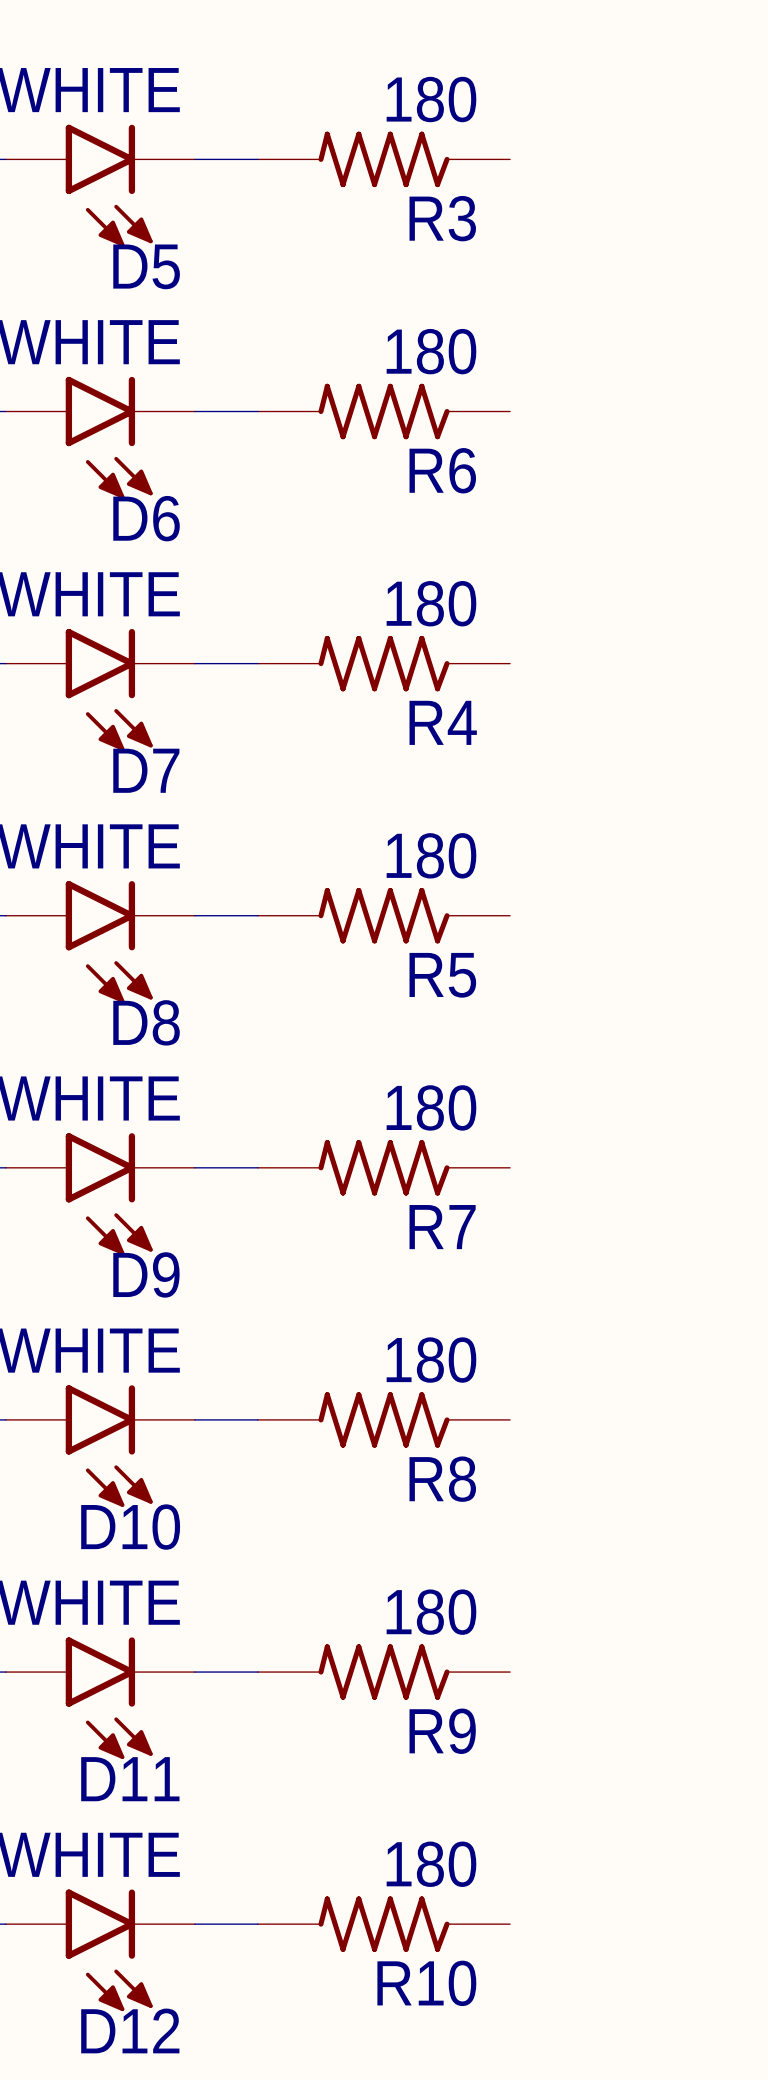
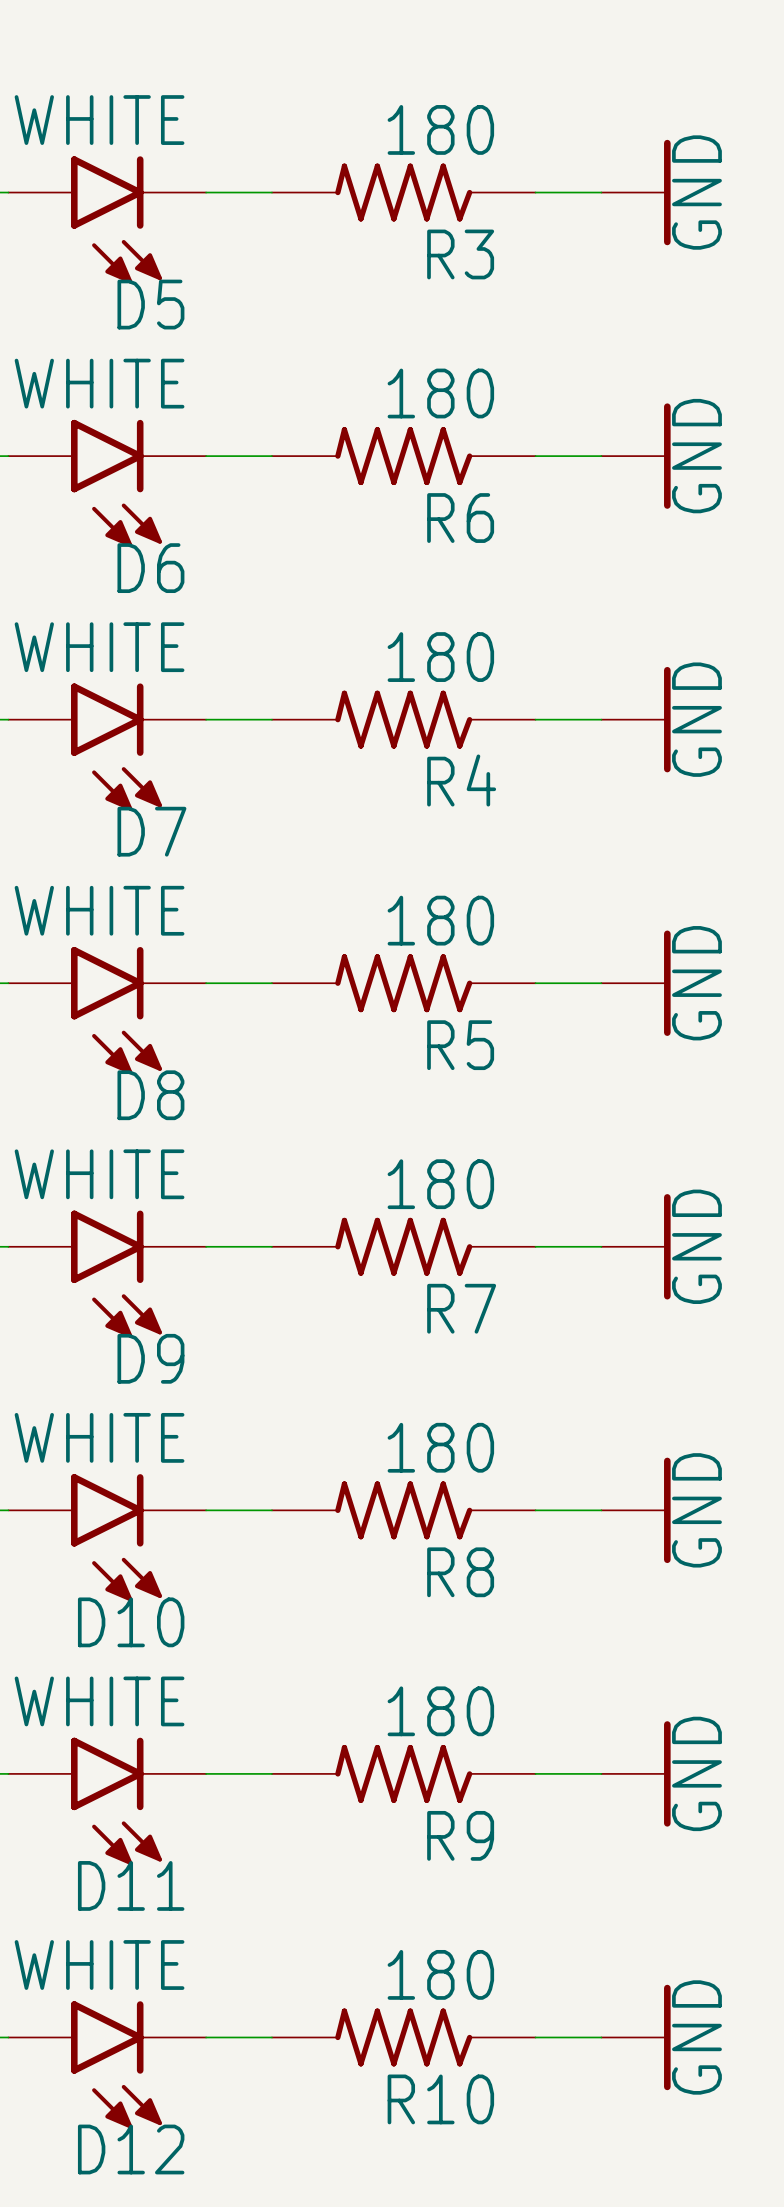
wire: none -> (535, 192) (601, 192)
power symbol: none -> GND (636, 192)
wire: none -> (535, 456) (601, 456)
power symbol: none -> GND (636, 456)
wire: none -> (535, 719) (601, 719)
power symbol: none -> GND (636, 719)
wire: none -> (535, 983) (601, 983)
power symbol: none -> GND (636, 983)
wire: none -> (535, 1246) (601, 1246)
power symbol: none -> GND (636, 1246)
wire: none -> (535, 1510) (601, 1510)
power symbol: none -> GND (636, 1510)
wire: none -> (535, 1773) (601, 1773)
power symbol: none -> GND (636, 1773)
wire: none -> (535, 2037) (601, 2037)
power symbol: none -> GND (636, 2037)

